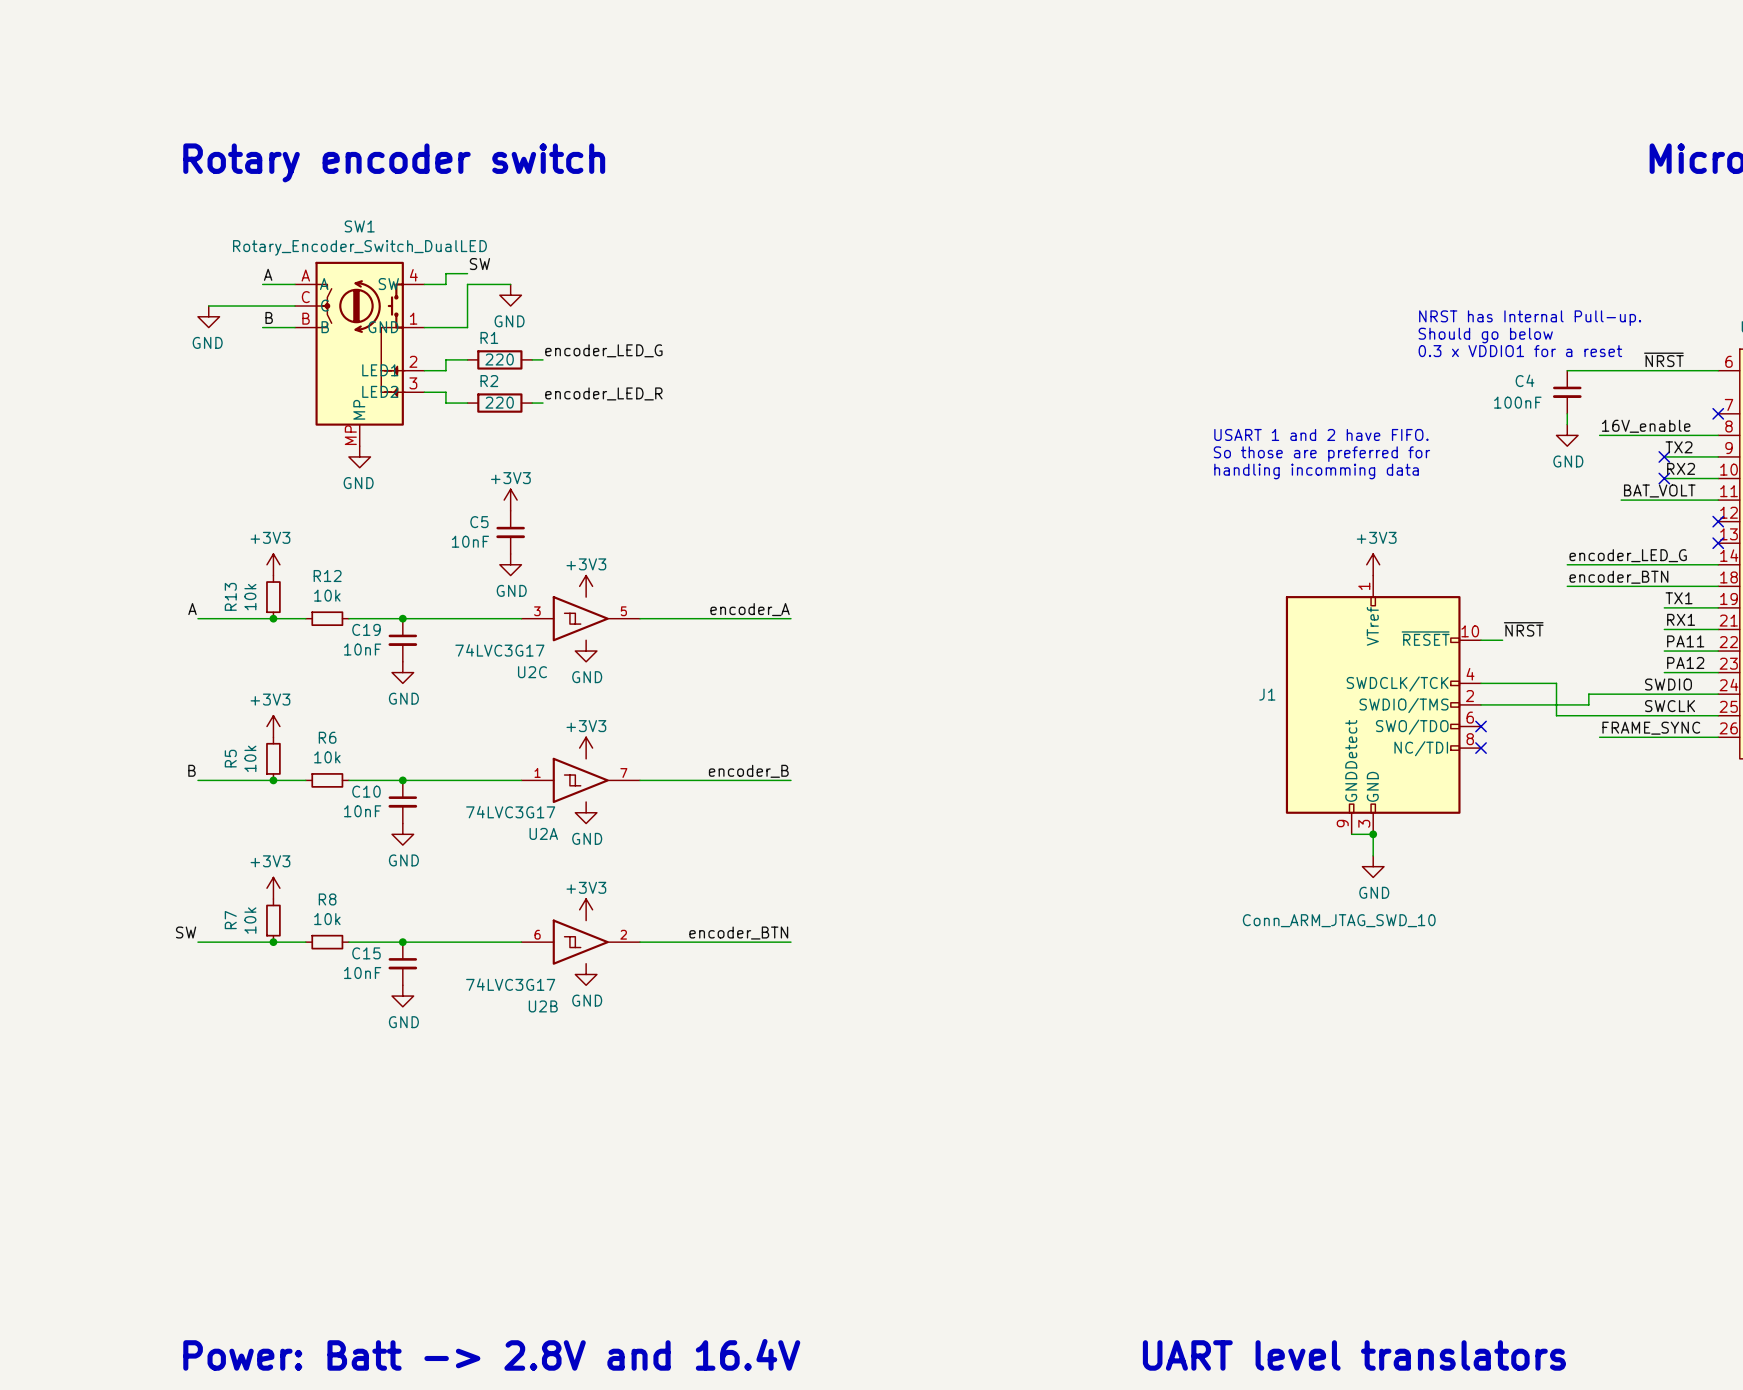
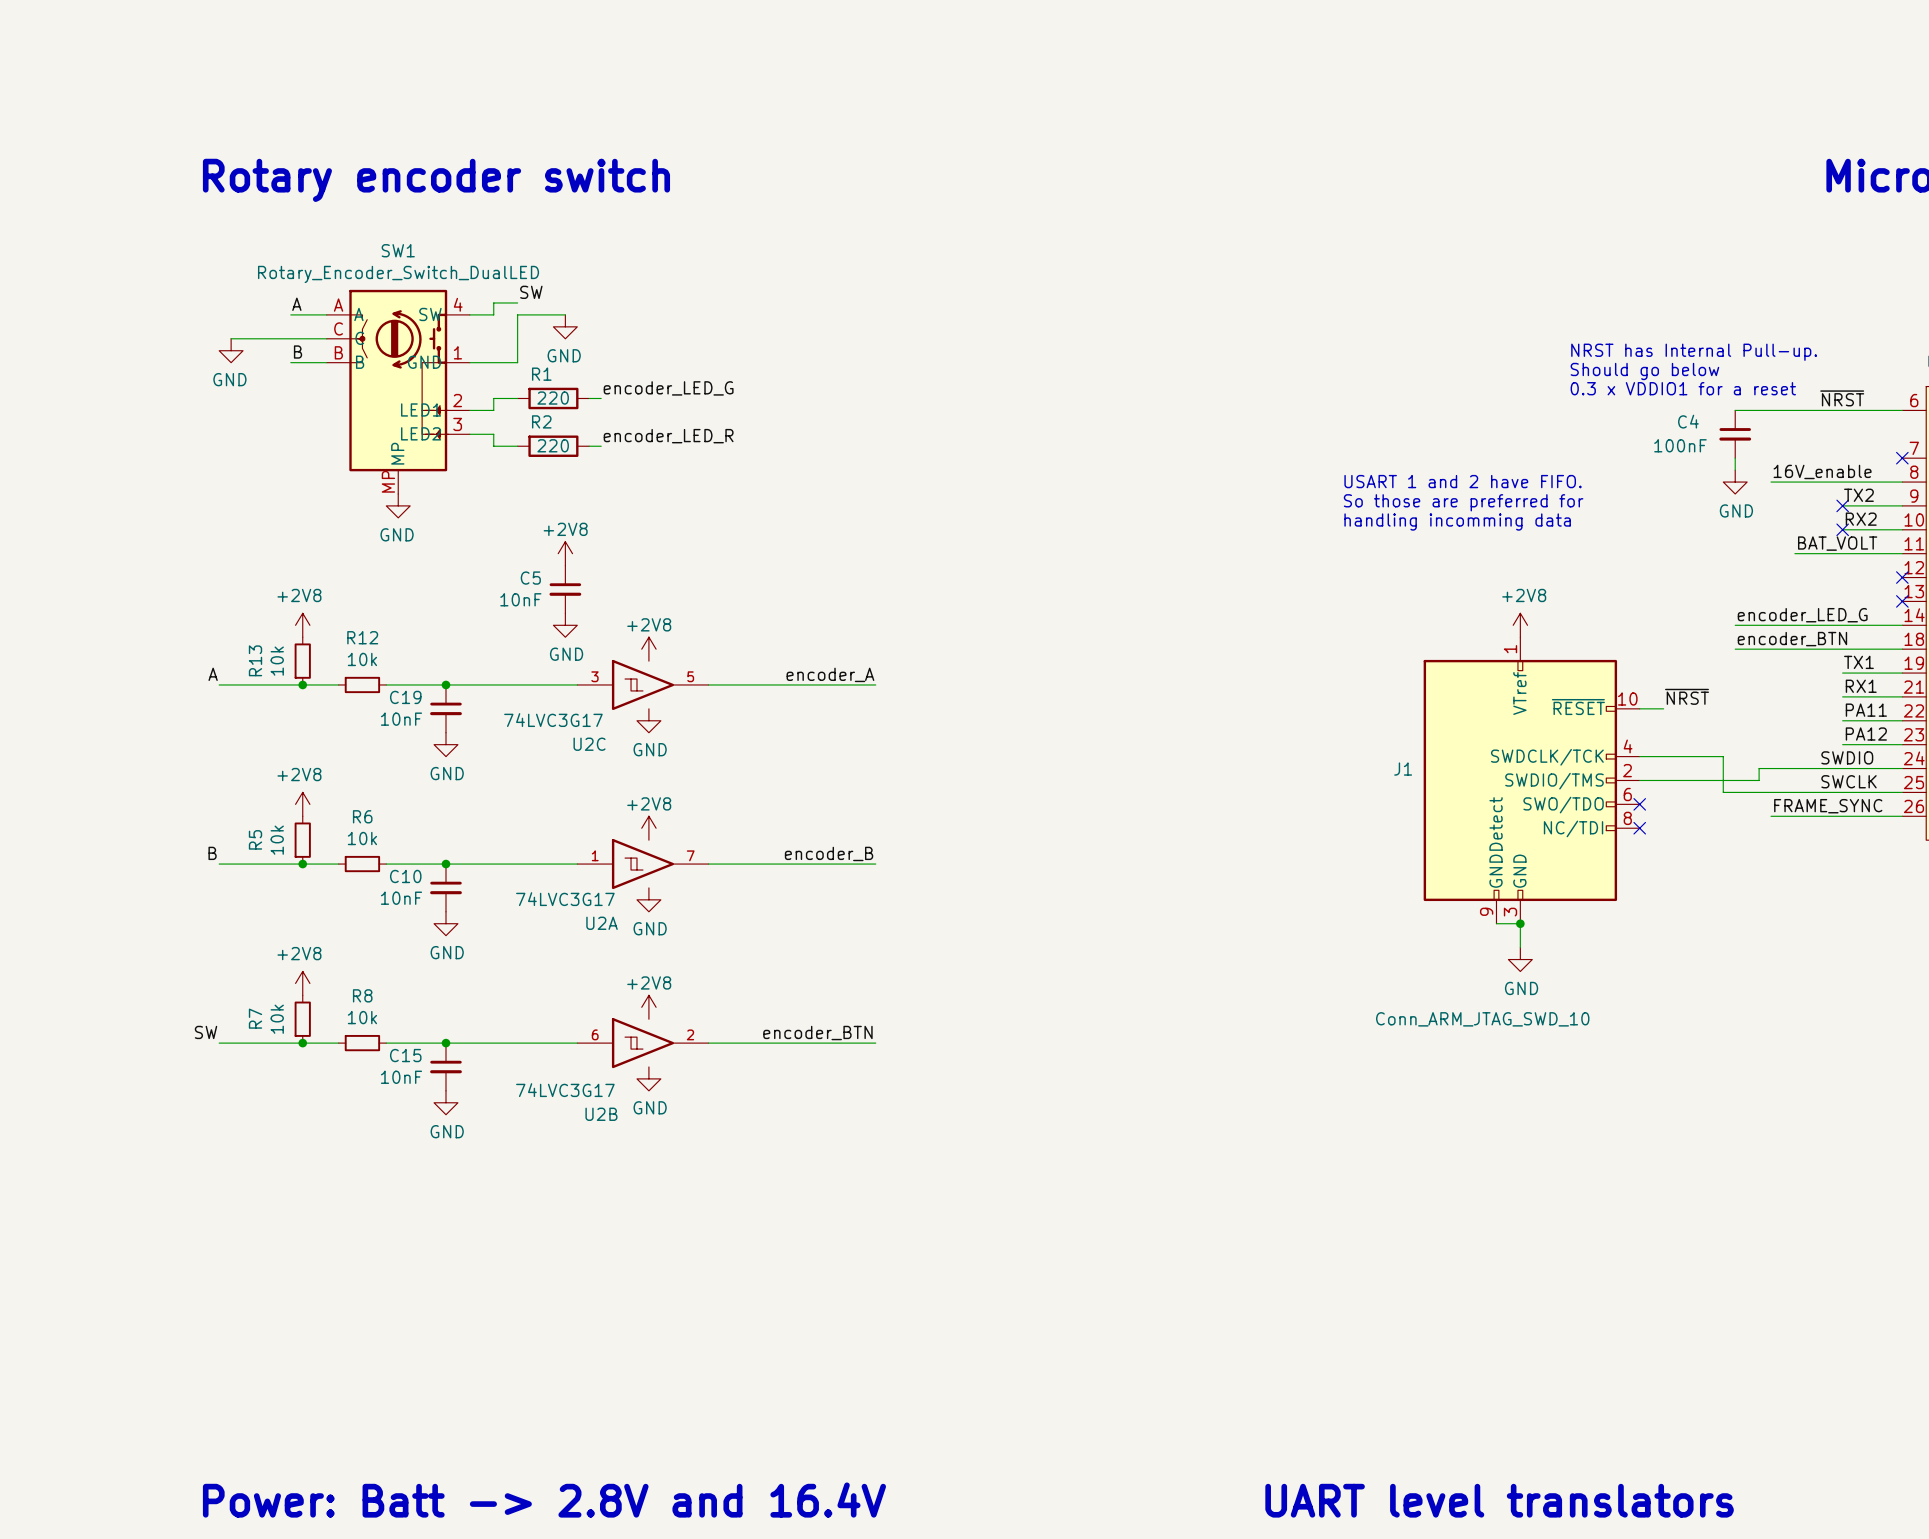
power symbol: +3V3 (510, 500) -> +2V8 (565, 553)
power symbol: +3V3 (273, 564) -> +2V8 (302, 625)
power symbol: +3V3 (1373, 564) -> +2V8 (1520, 625)
power symbol: +3V3 (586, 586) -> +2V8 (648, 649)
power symbol: +3V3 (273, 726) -> +2V8 (302, 804)
power symbol: +3V3 (586, 748) -> +2V8 (648, 828)
power symbol: +3V3 (273, 888) -> +2V8 (302, 983)
power symbol: +3V3 (586, 909) -> +2V8 (648, 1007)

